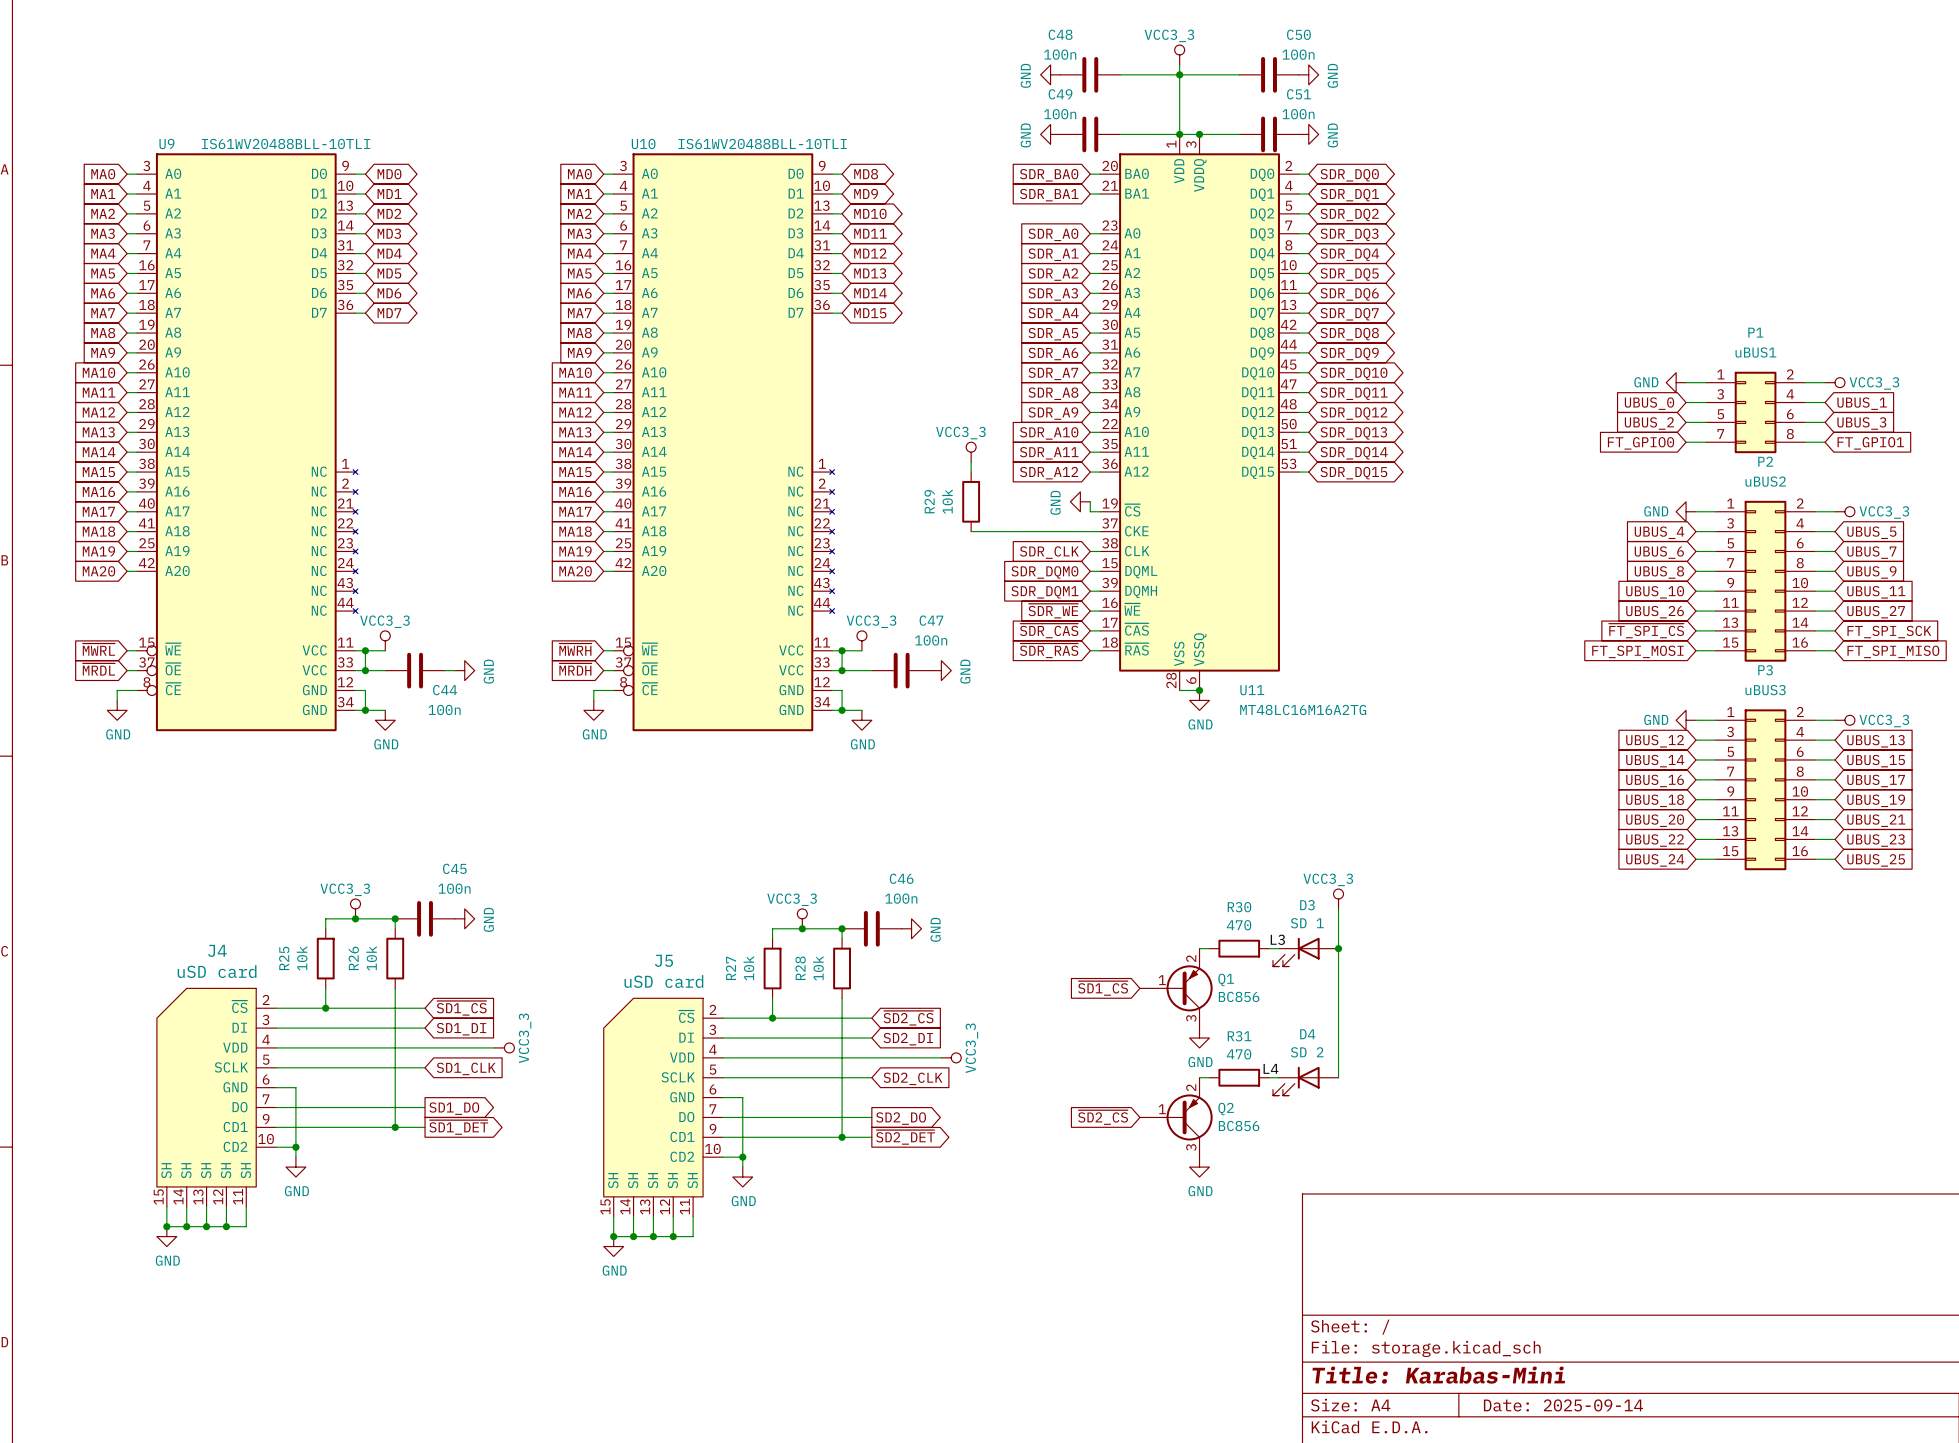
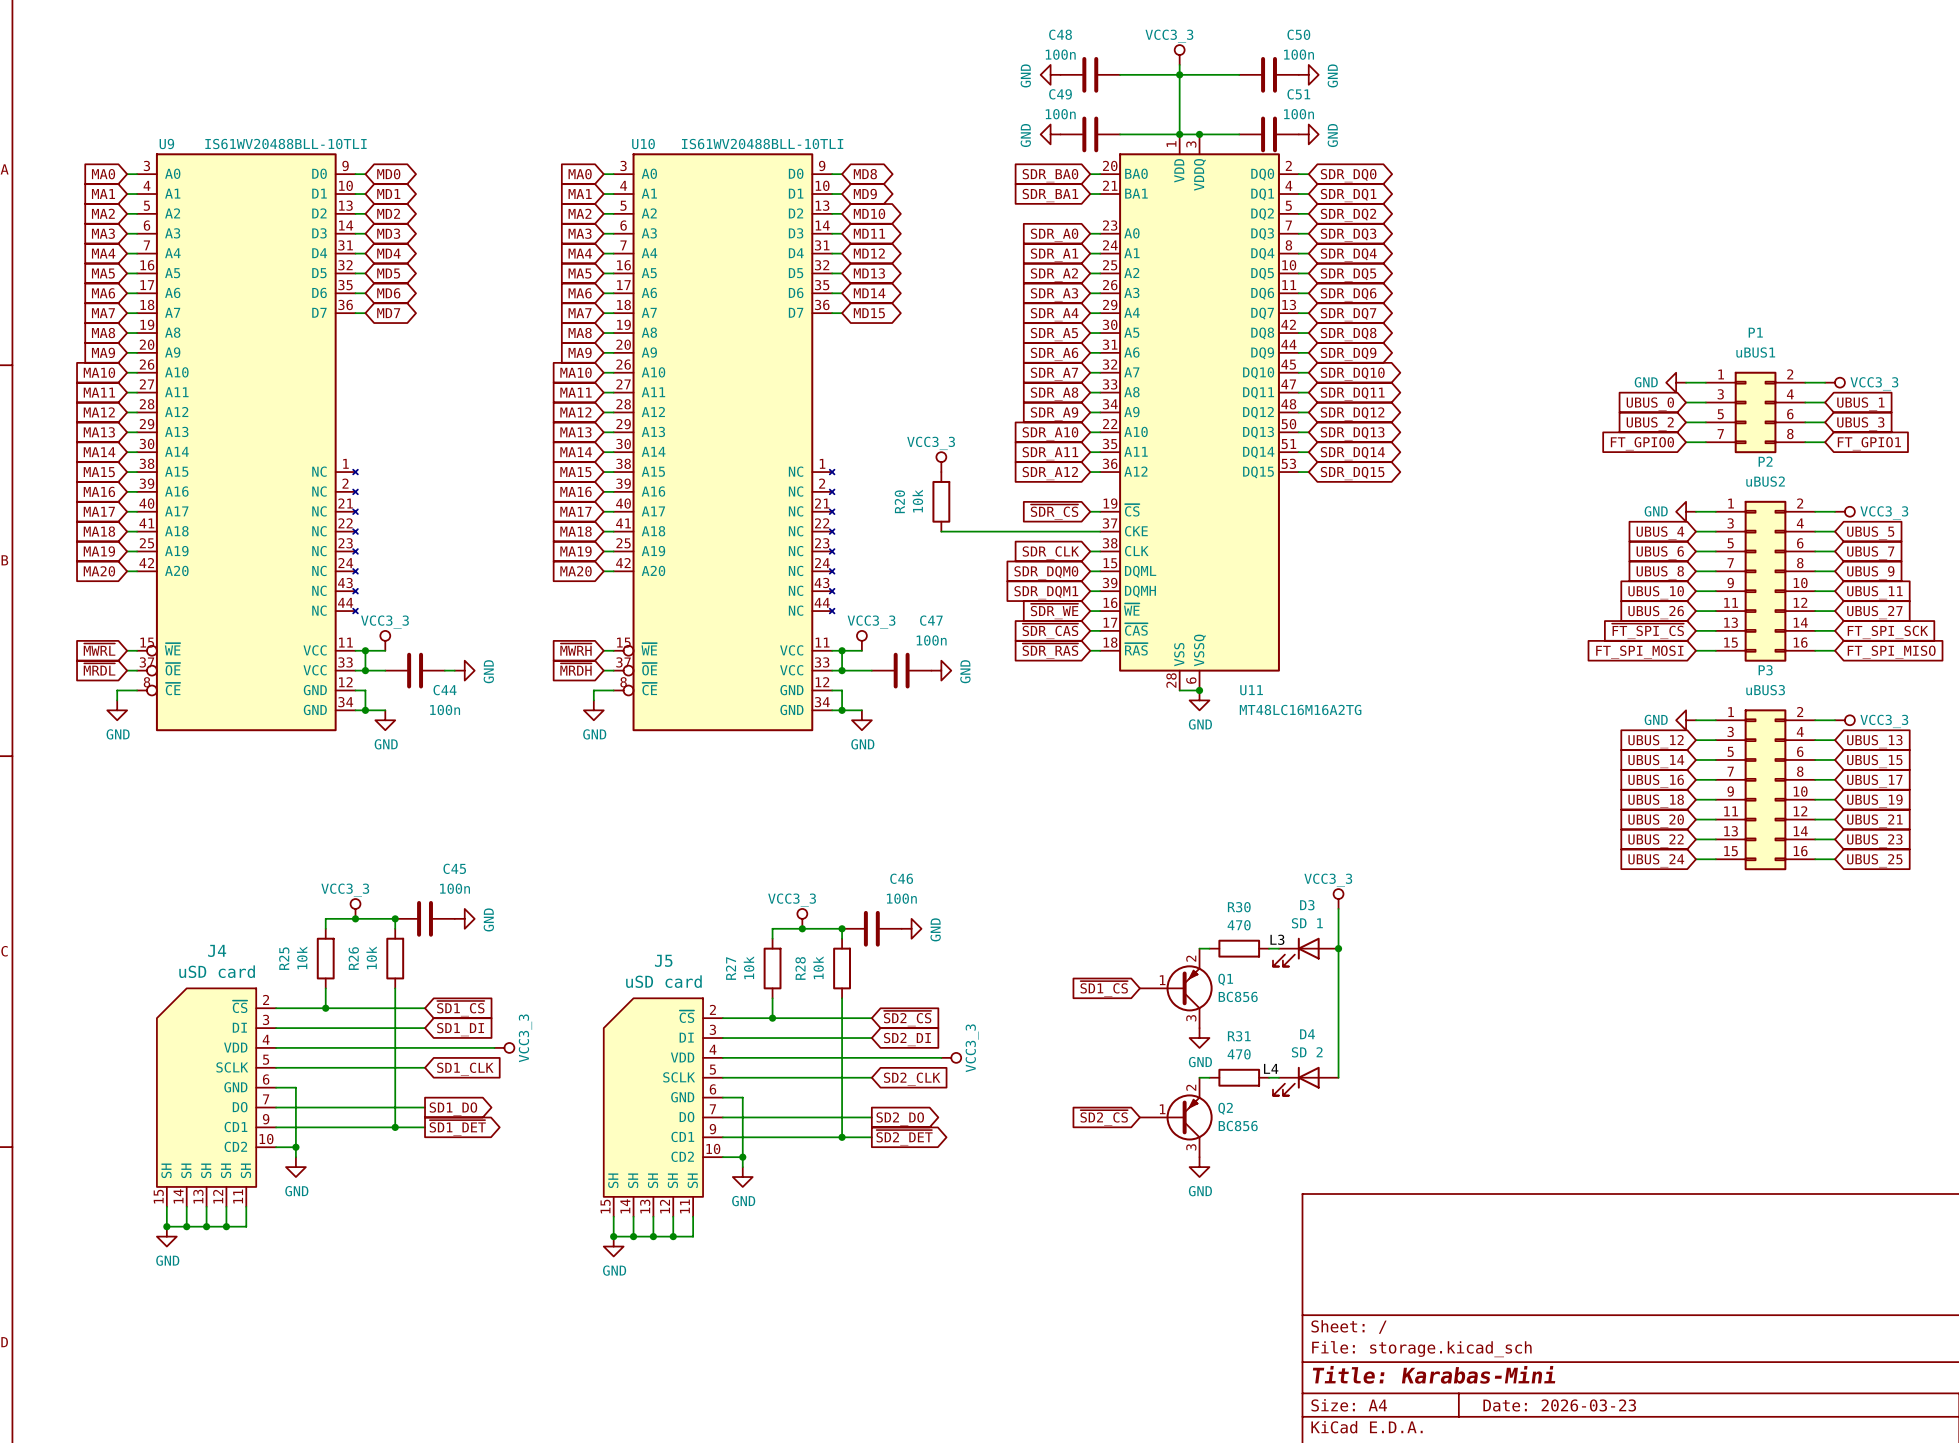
power symbol position: VCC3_3 (971, 452) -> VCC3_3 (941, 462)
wire: (971, 462) (971, 472) -> none
R20: none -> 10k (941, 501)
R29: 10k (971, 501) -> none
power symbol: GND (1080, 501) -> none
wire: (1090, 501) (1090, 511) -> none
global label: none -> ~{SDR_CS} (1054, 512)
wire: none -> (941, 531) (971, 531)
title block: Date: 2025-09-14 (1563, 1405) -> Date: 2026-03-23 (1559, 1405)

